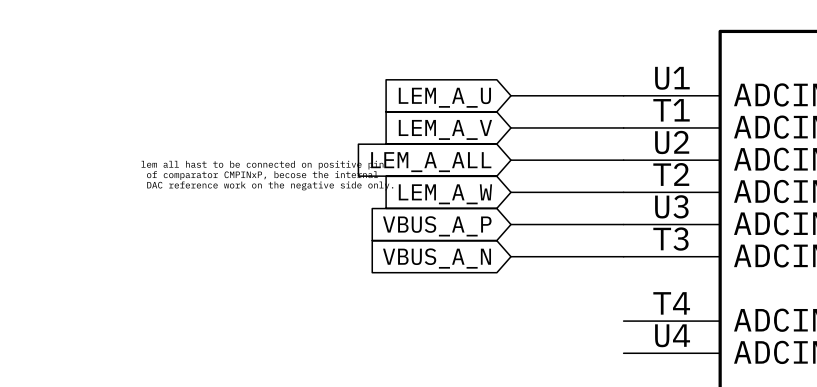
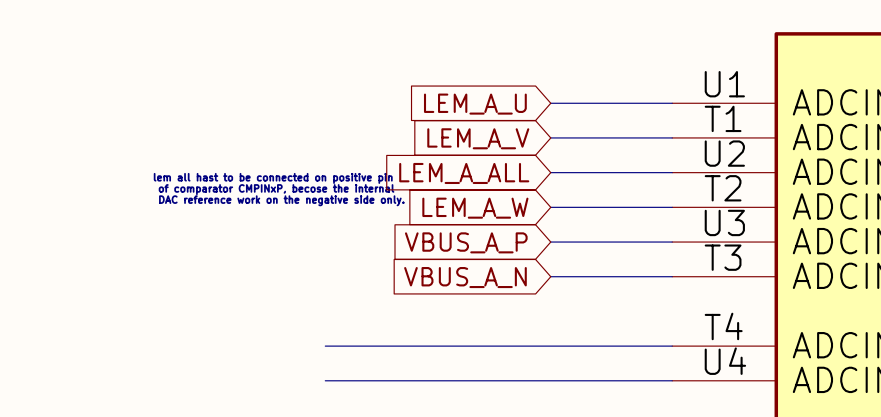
wire: none -> (325, 346) (672, 346)
wire: none -> (325, 380) (672, 380)

